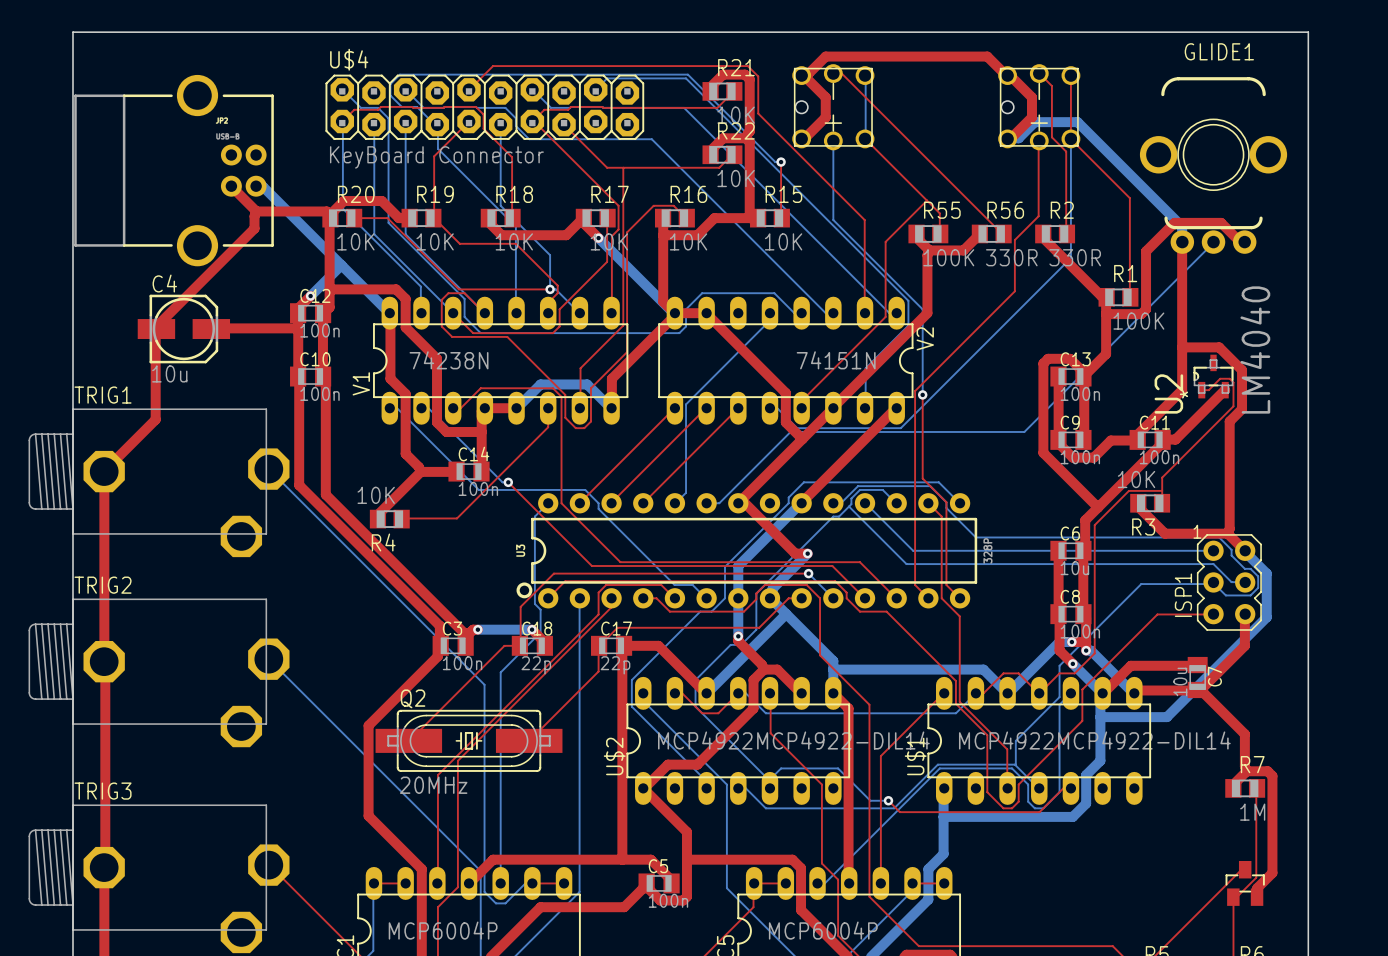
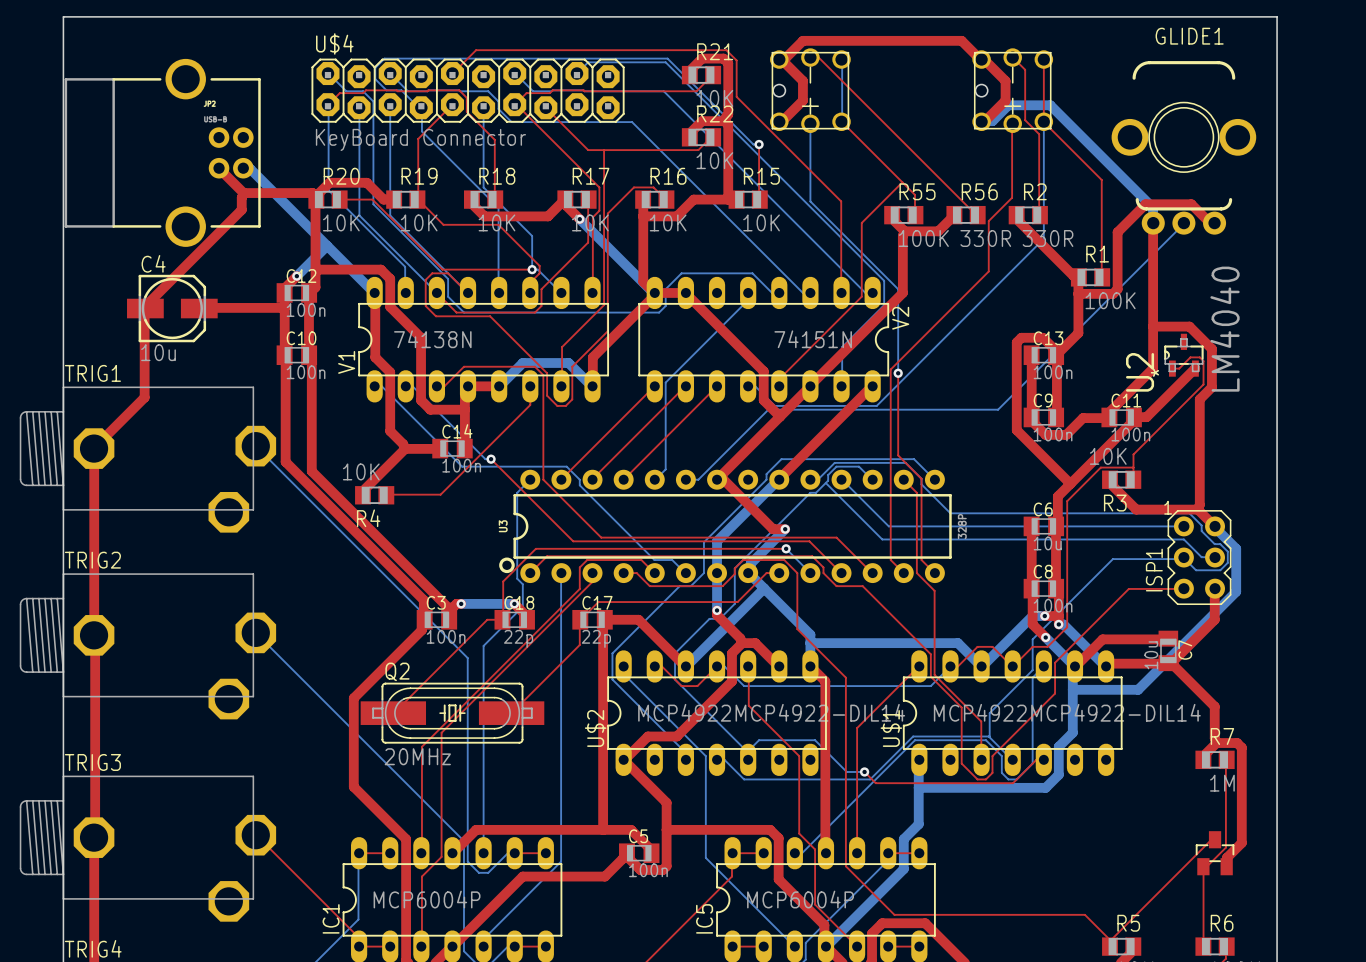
V1 value: 74238N (449, 360) -> 74138N (432, 339)

